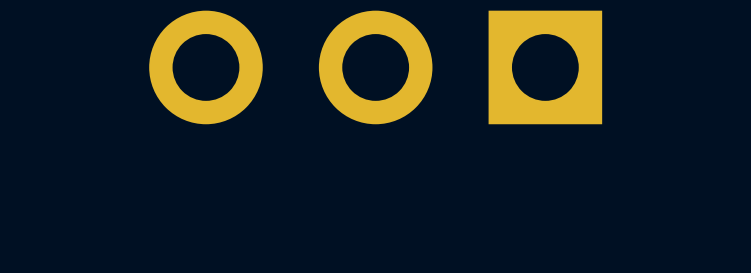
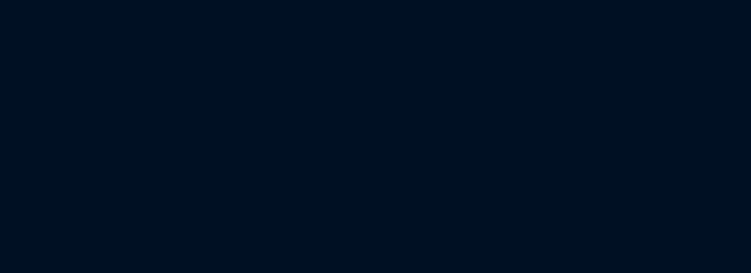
part: (375, 67) -> none

